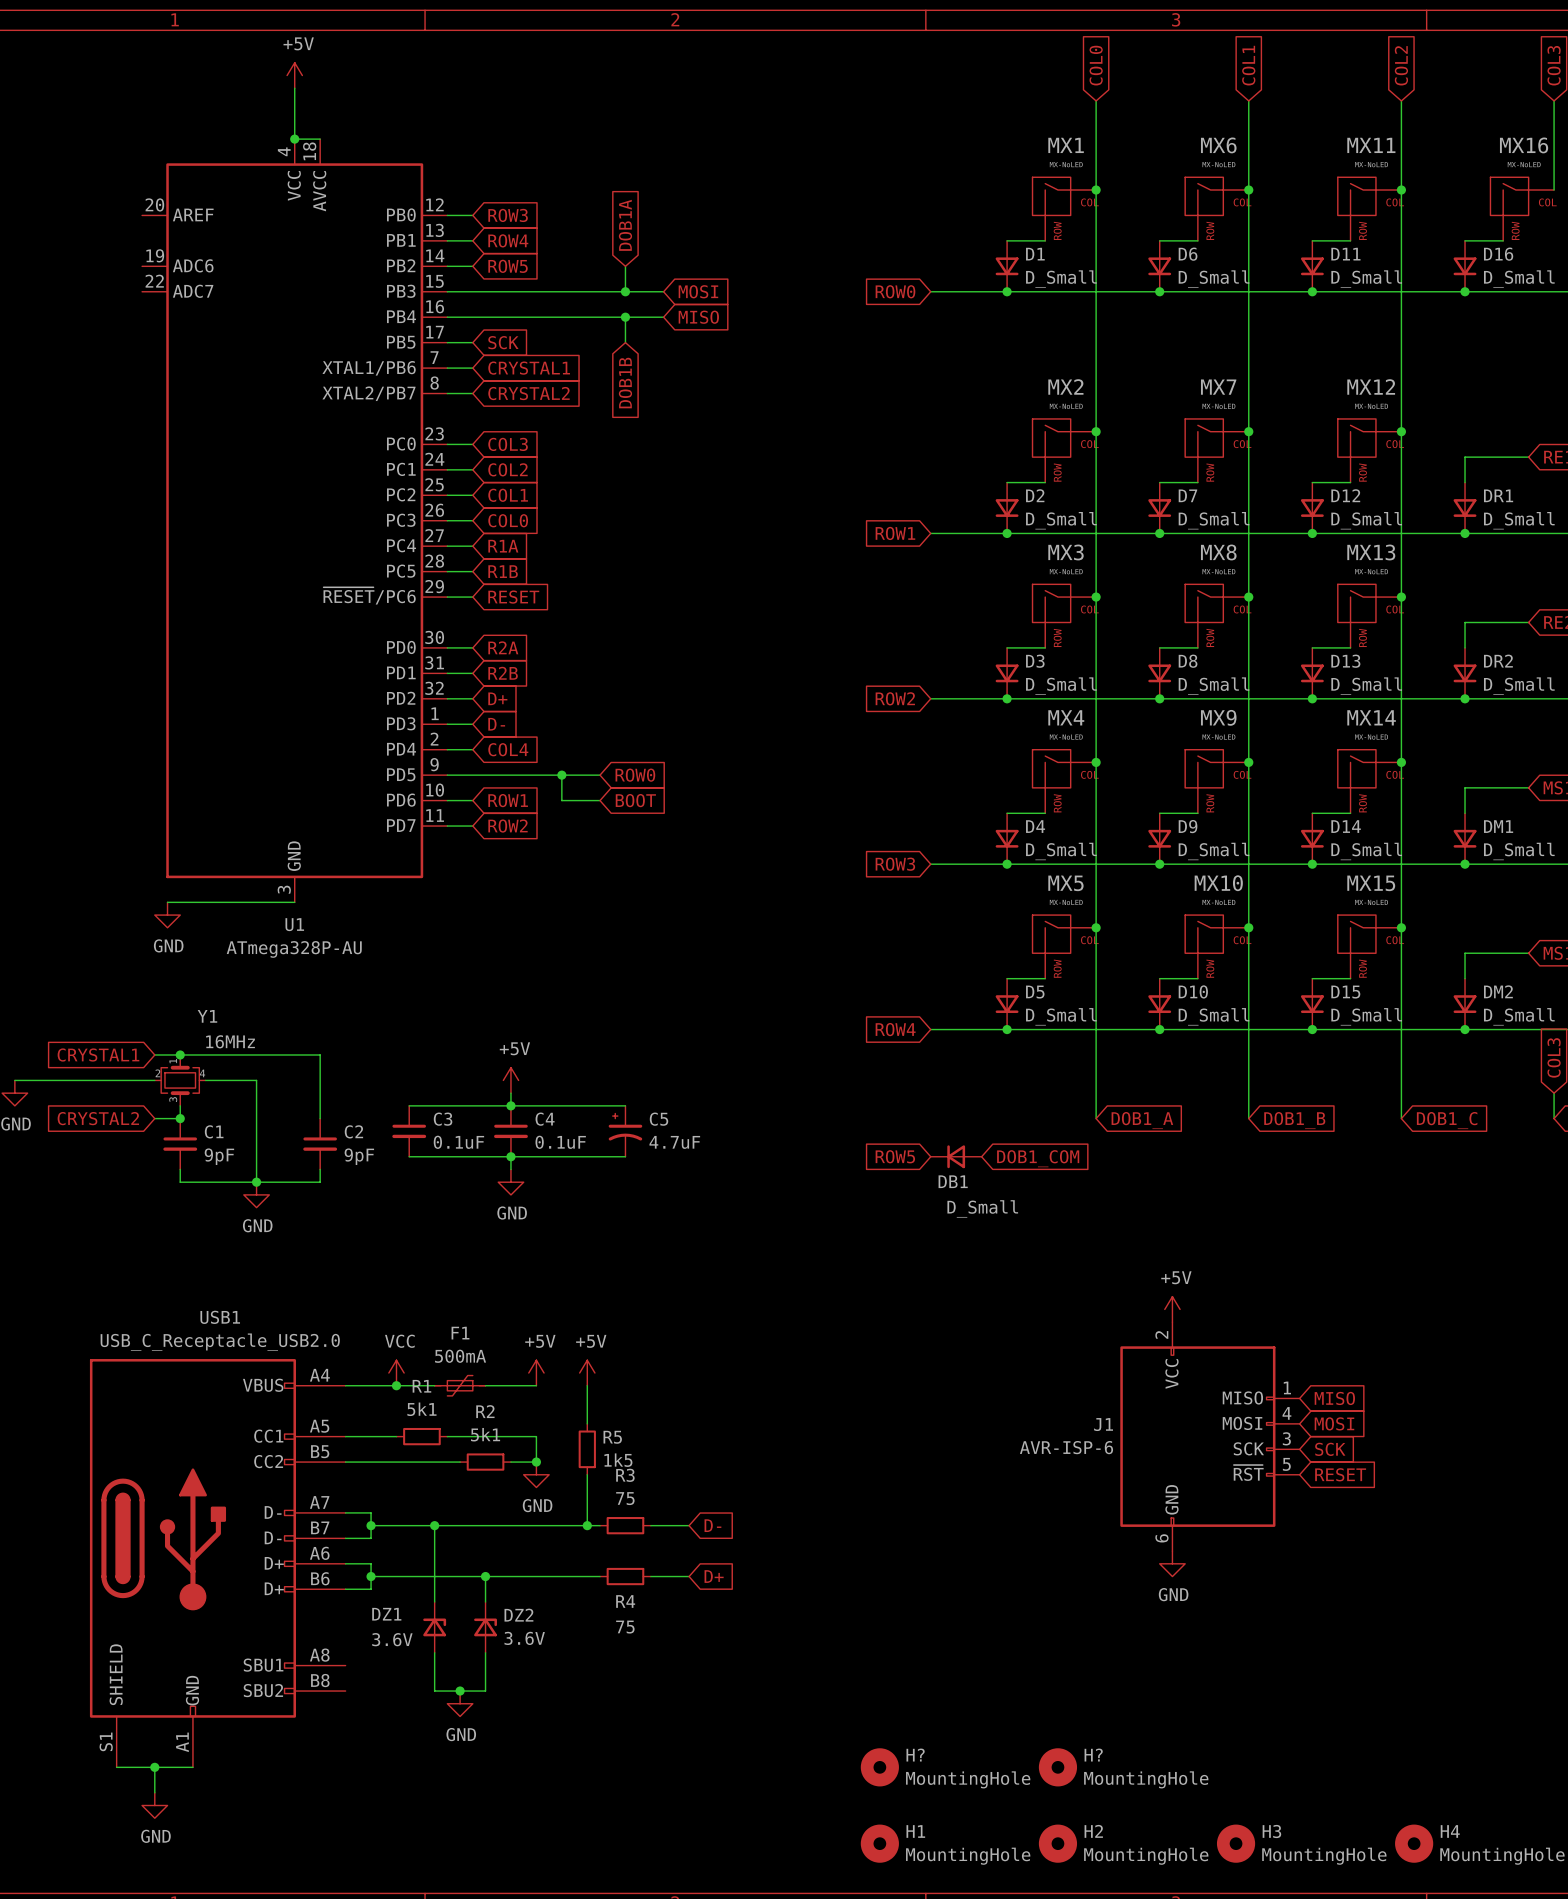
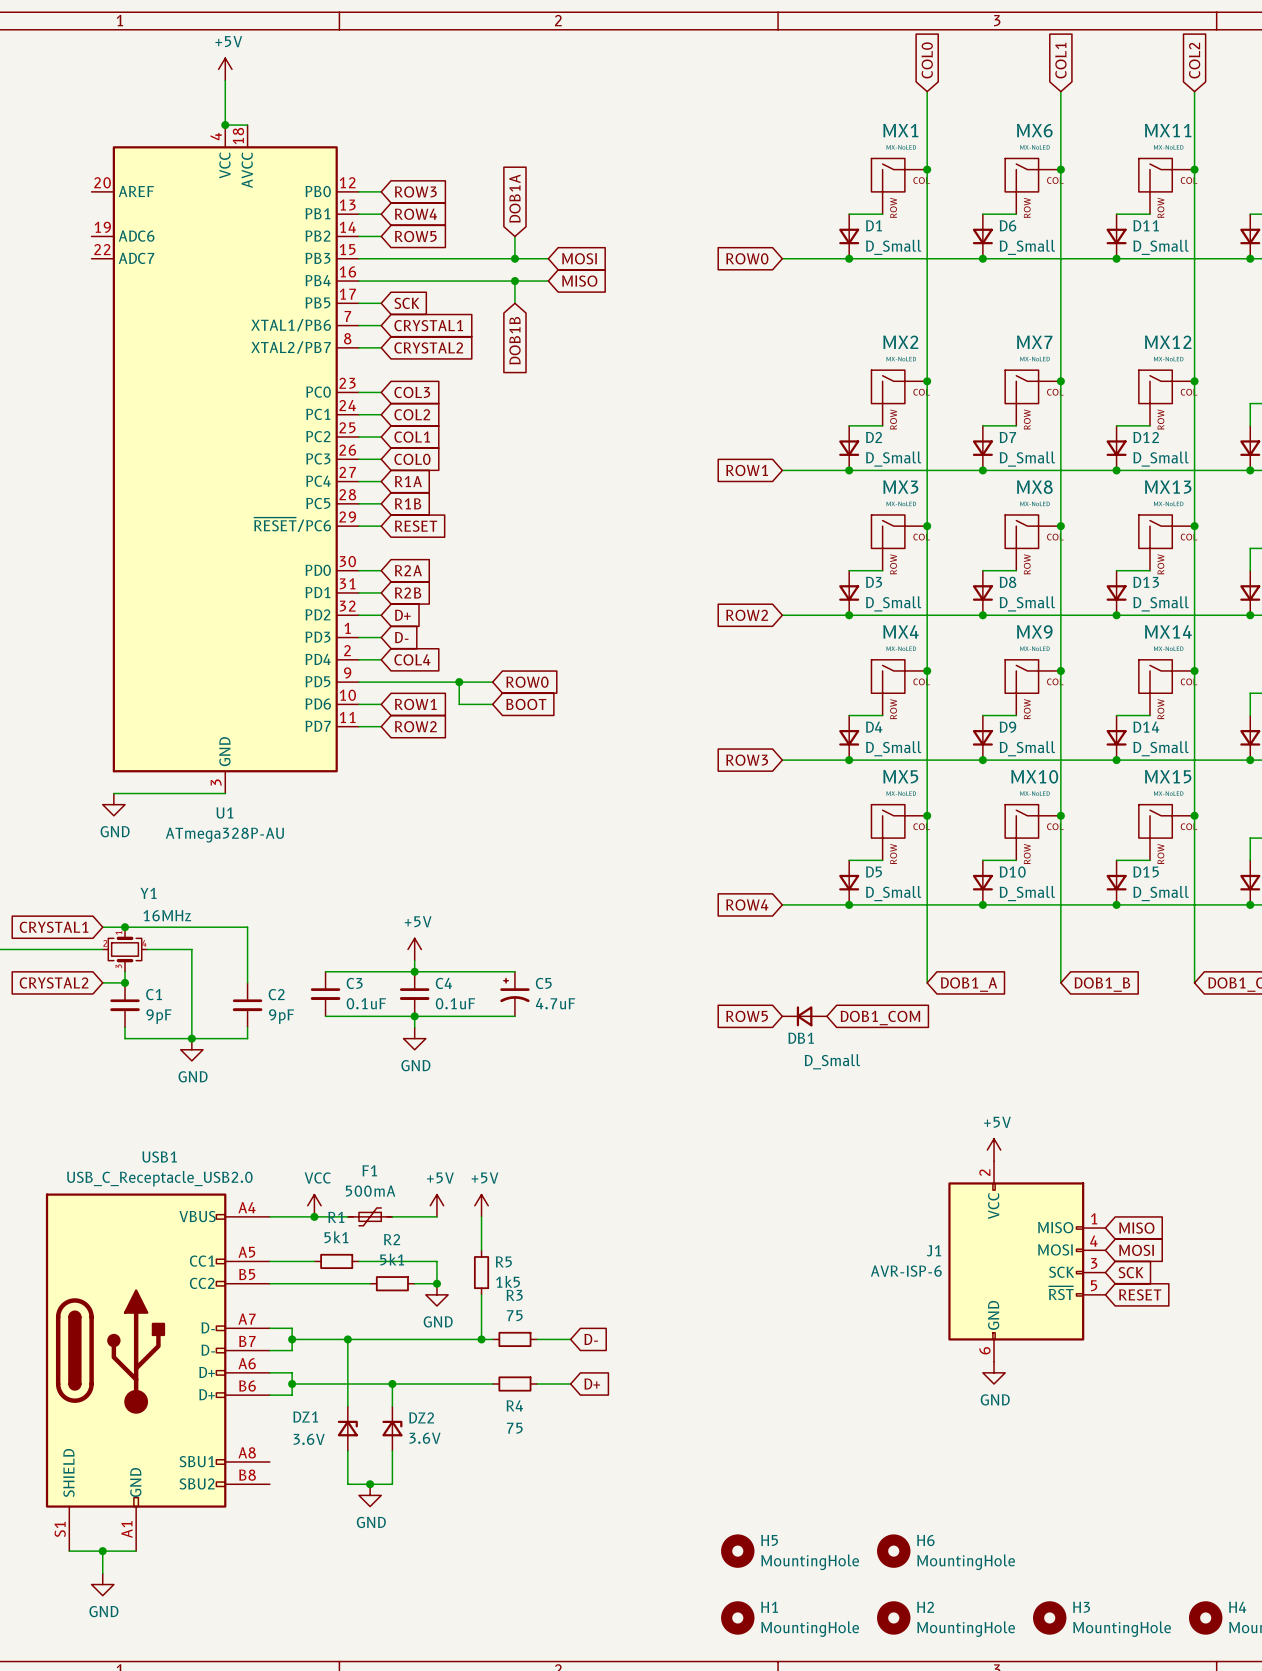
H? name: H? (915, 1755) -> H5 (769, 1540)
H? name: H? (1093, 1755) -> H6 (925, 1540)

